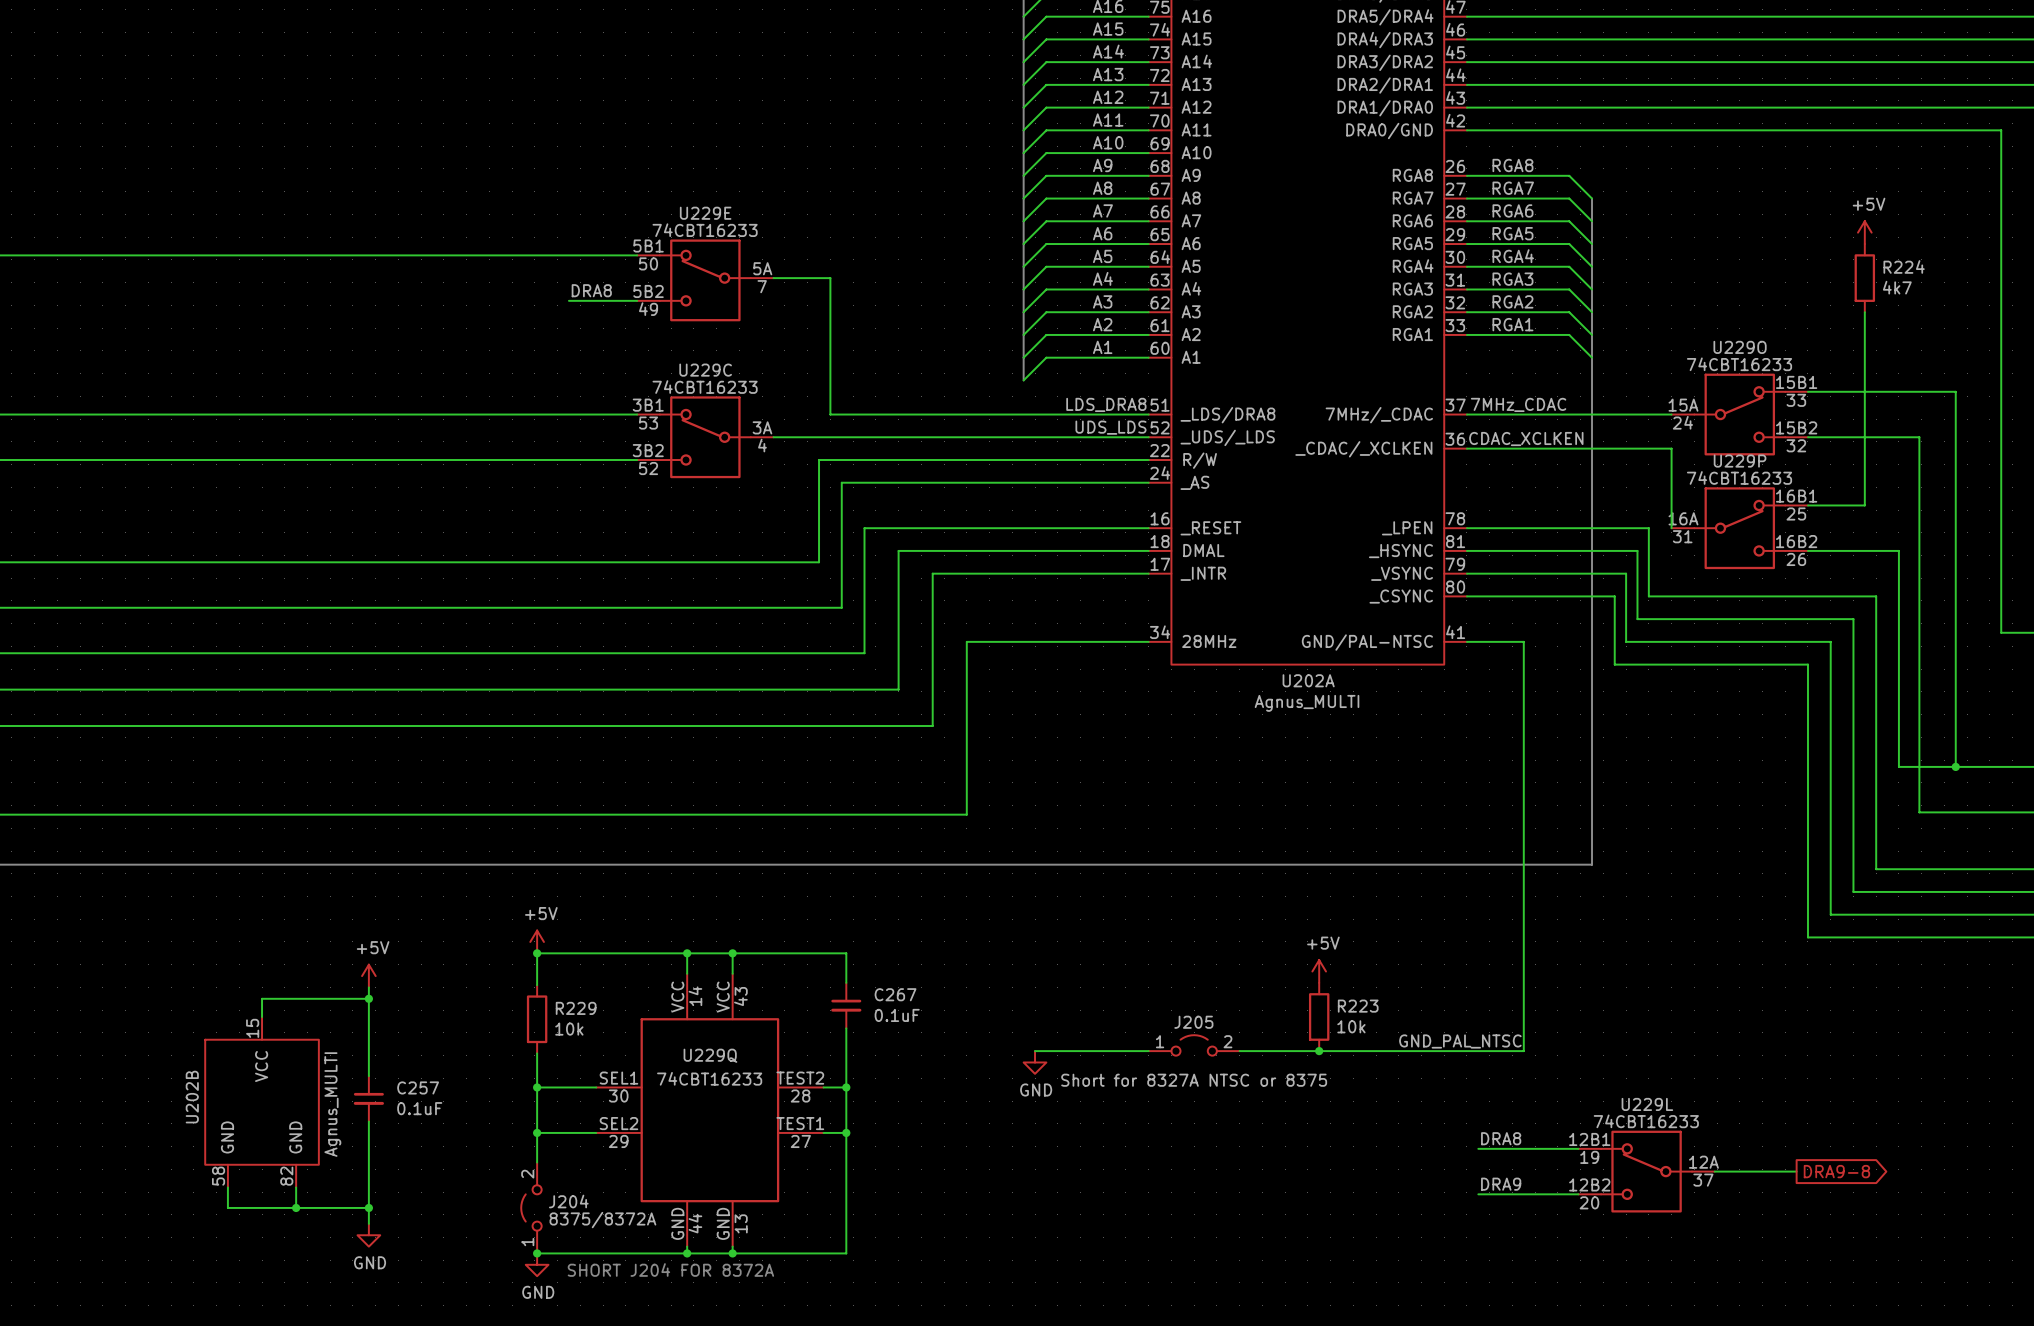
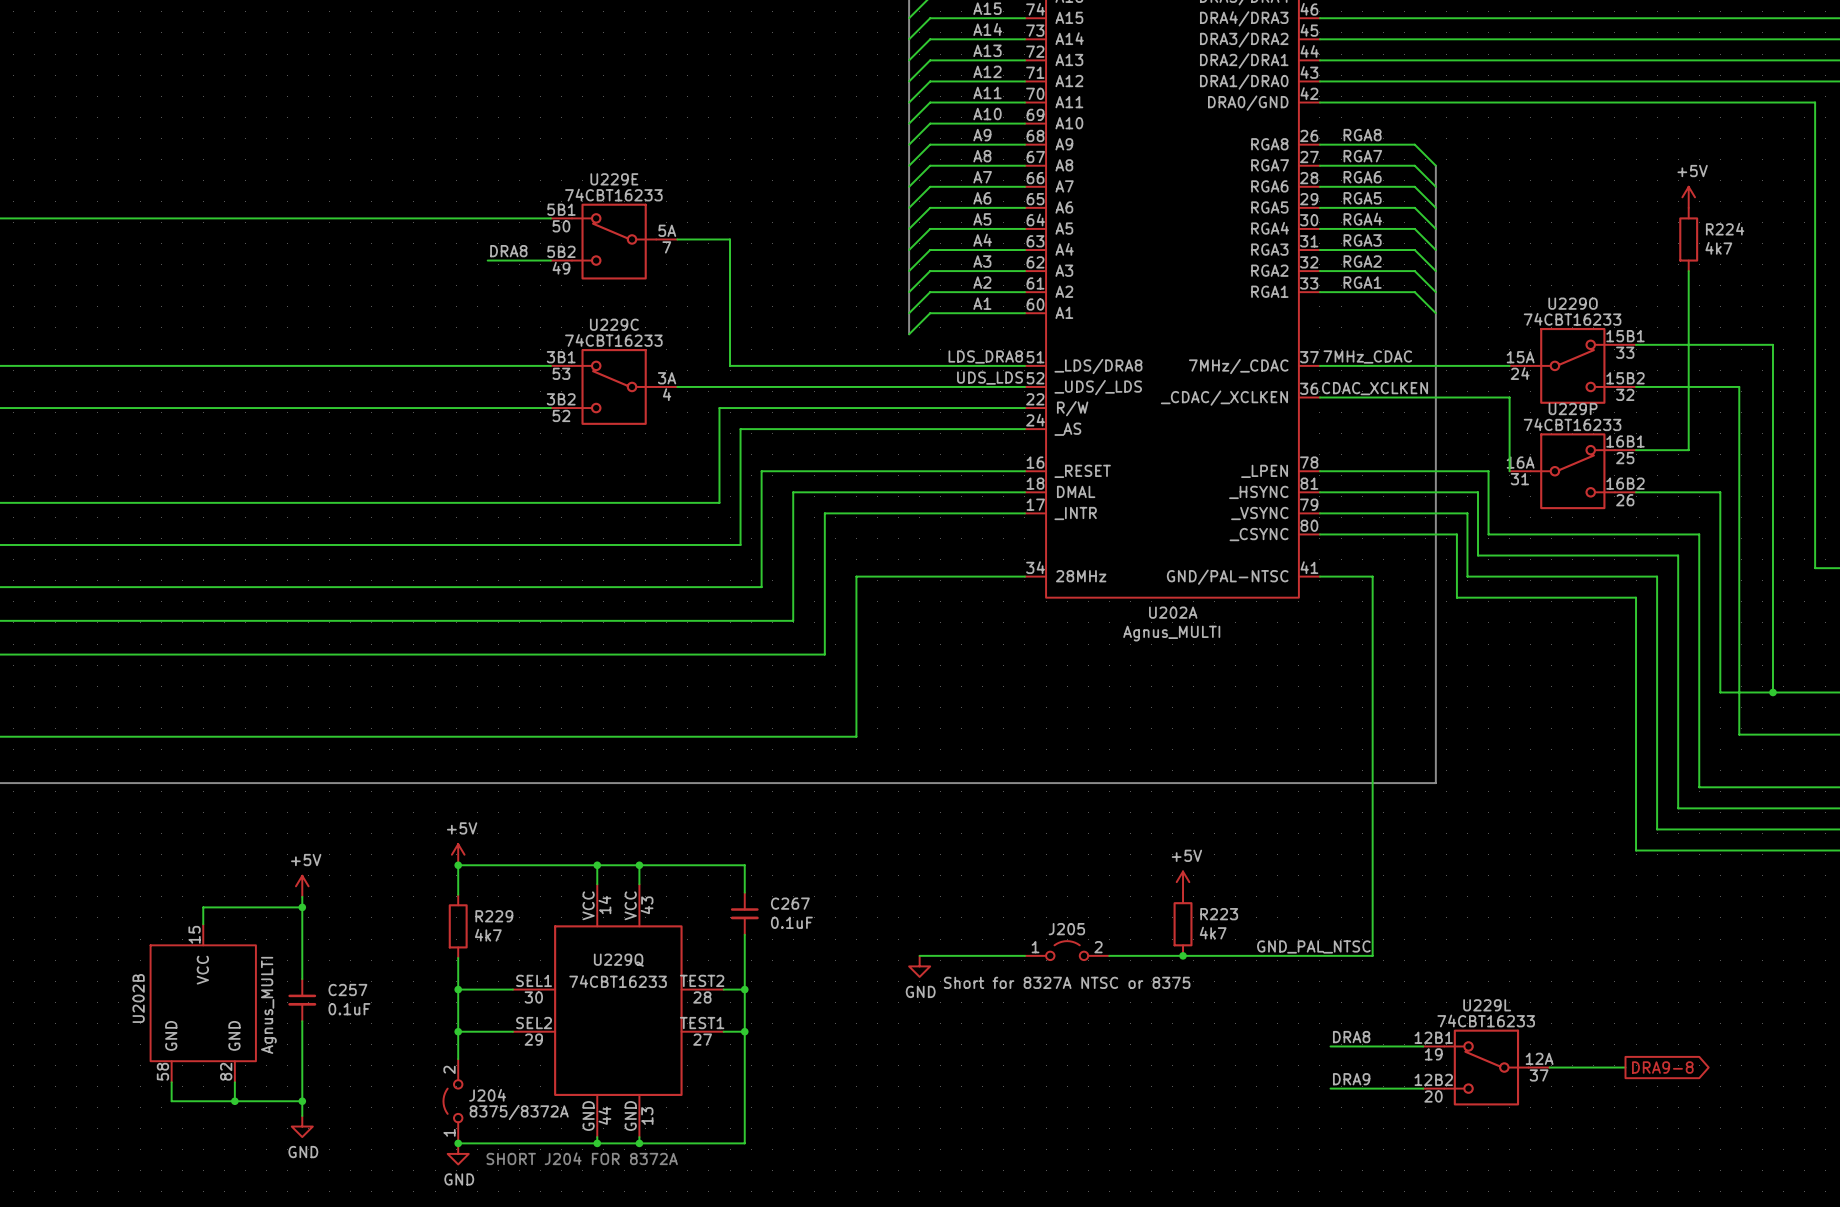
R223 value: 10k (1351, 1026) -> 4k7 (1213, 933)
R229 value: 10k (569, 1029) -> 4k7 (488, 935)

